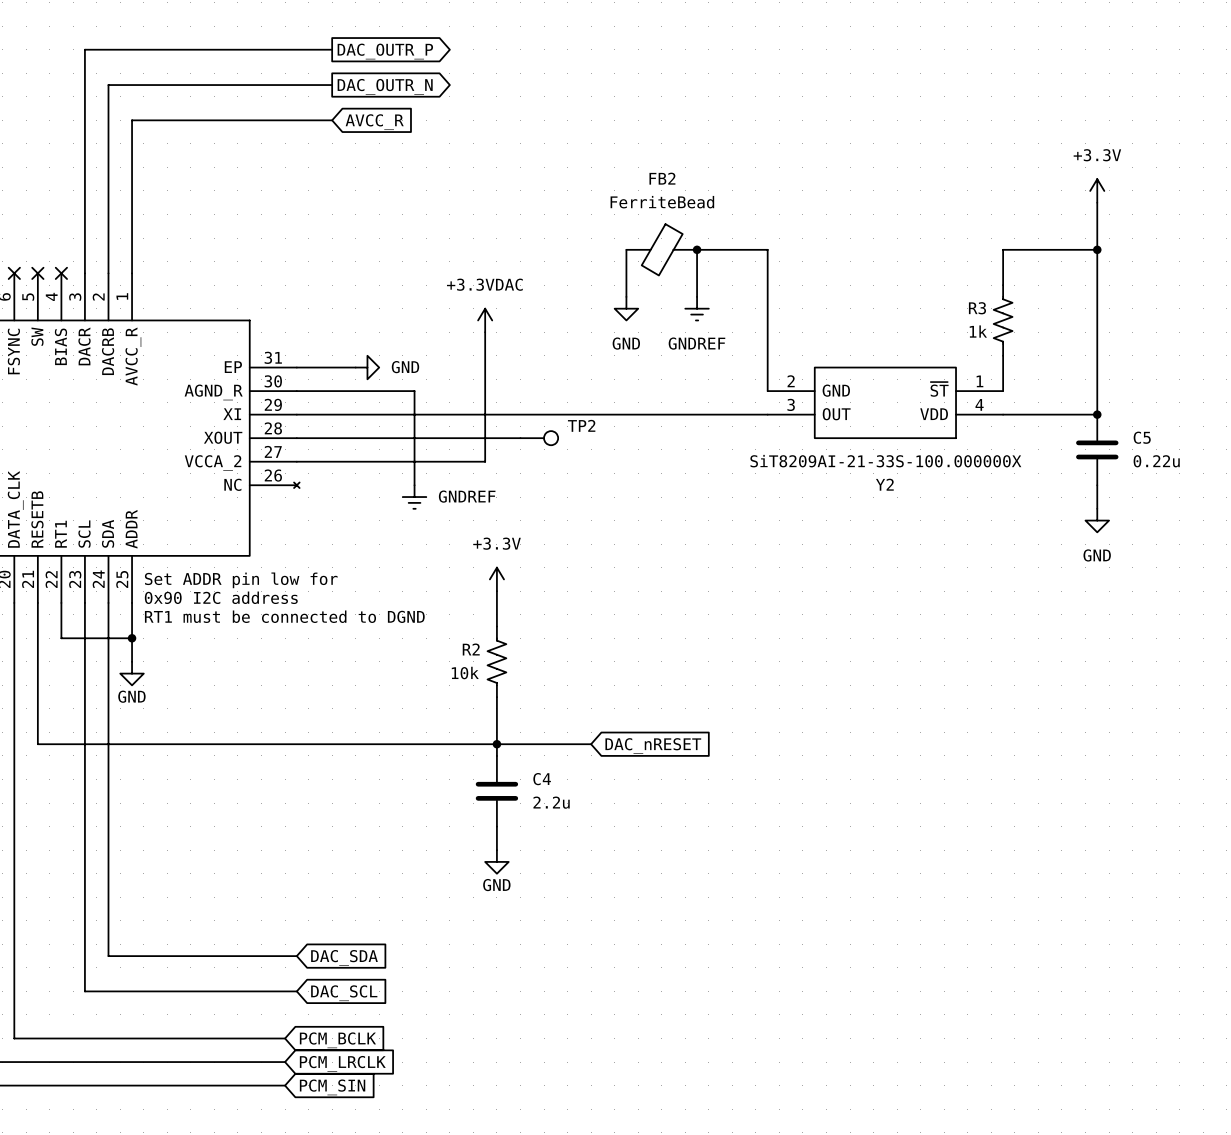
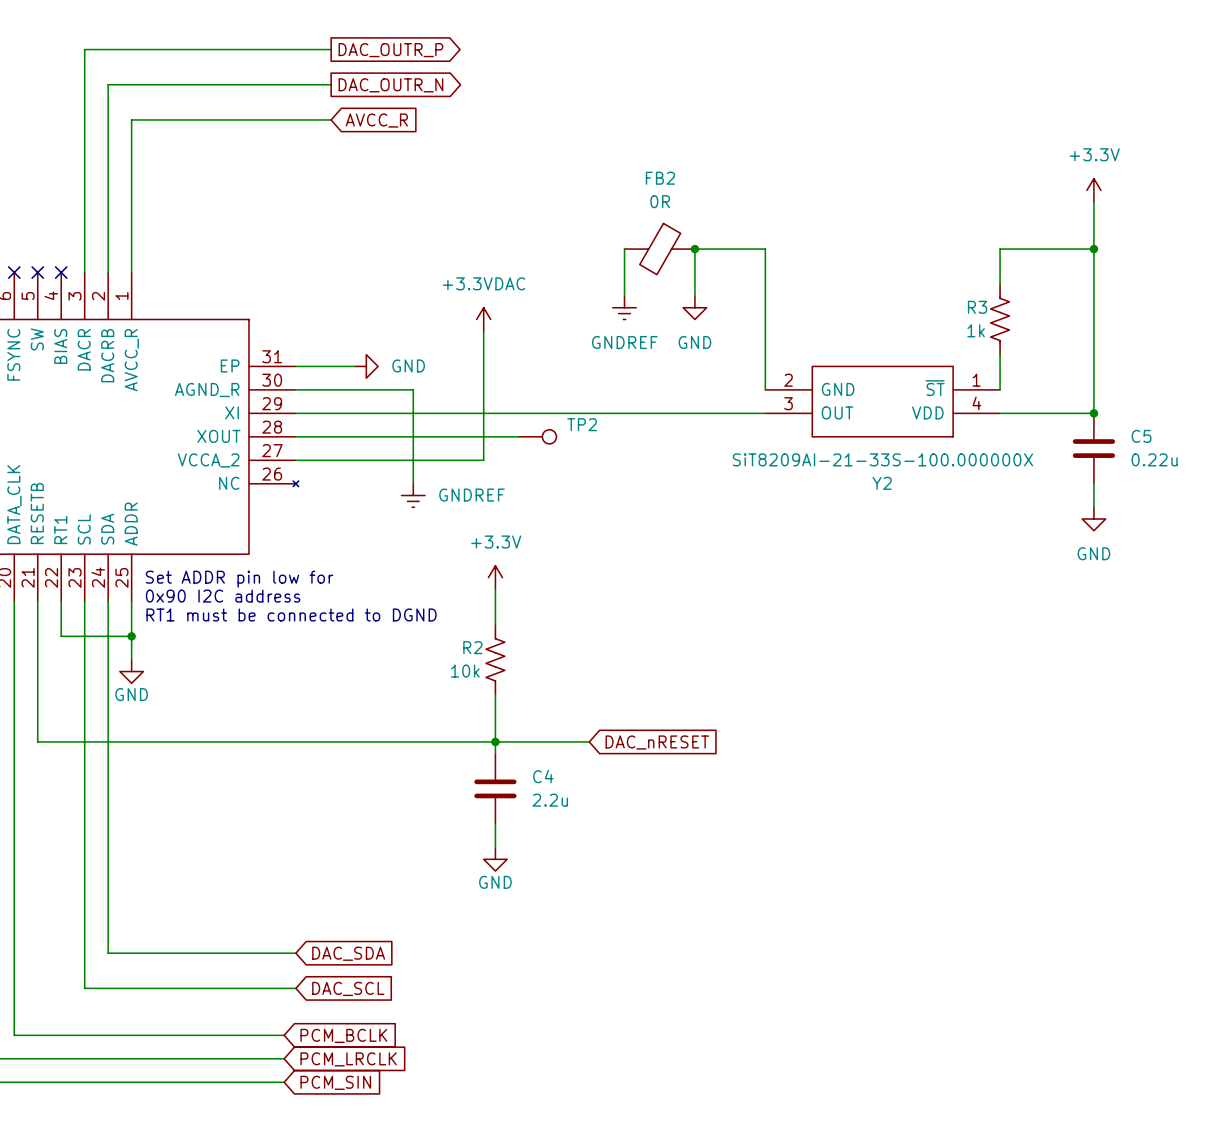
FB2 value: FerriteBead (662, 202) -> 0R (660, 201)
power symbol: GND (626, 308) -> GNDREF (624, 307)
power symbol: GNDREF (697, 308) -> GND (694, 307)

